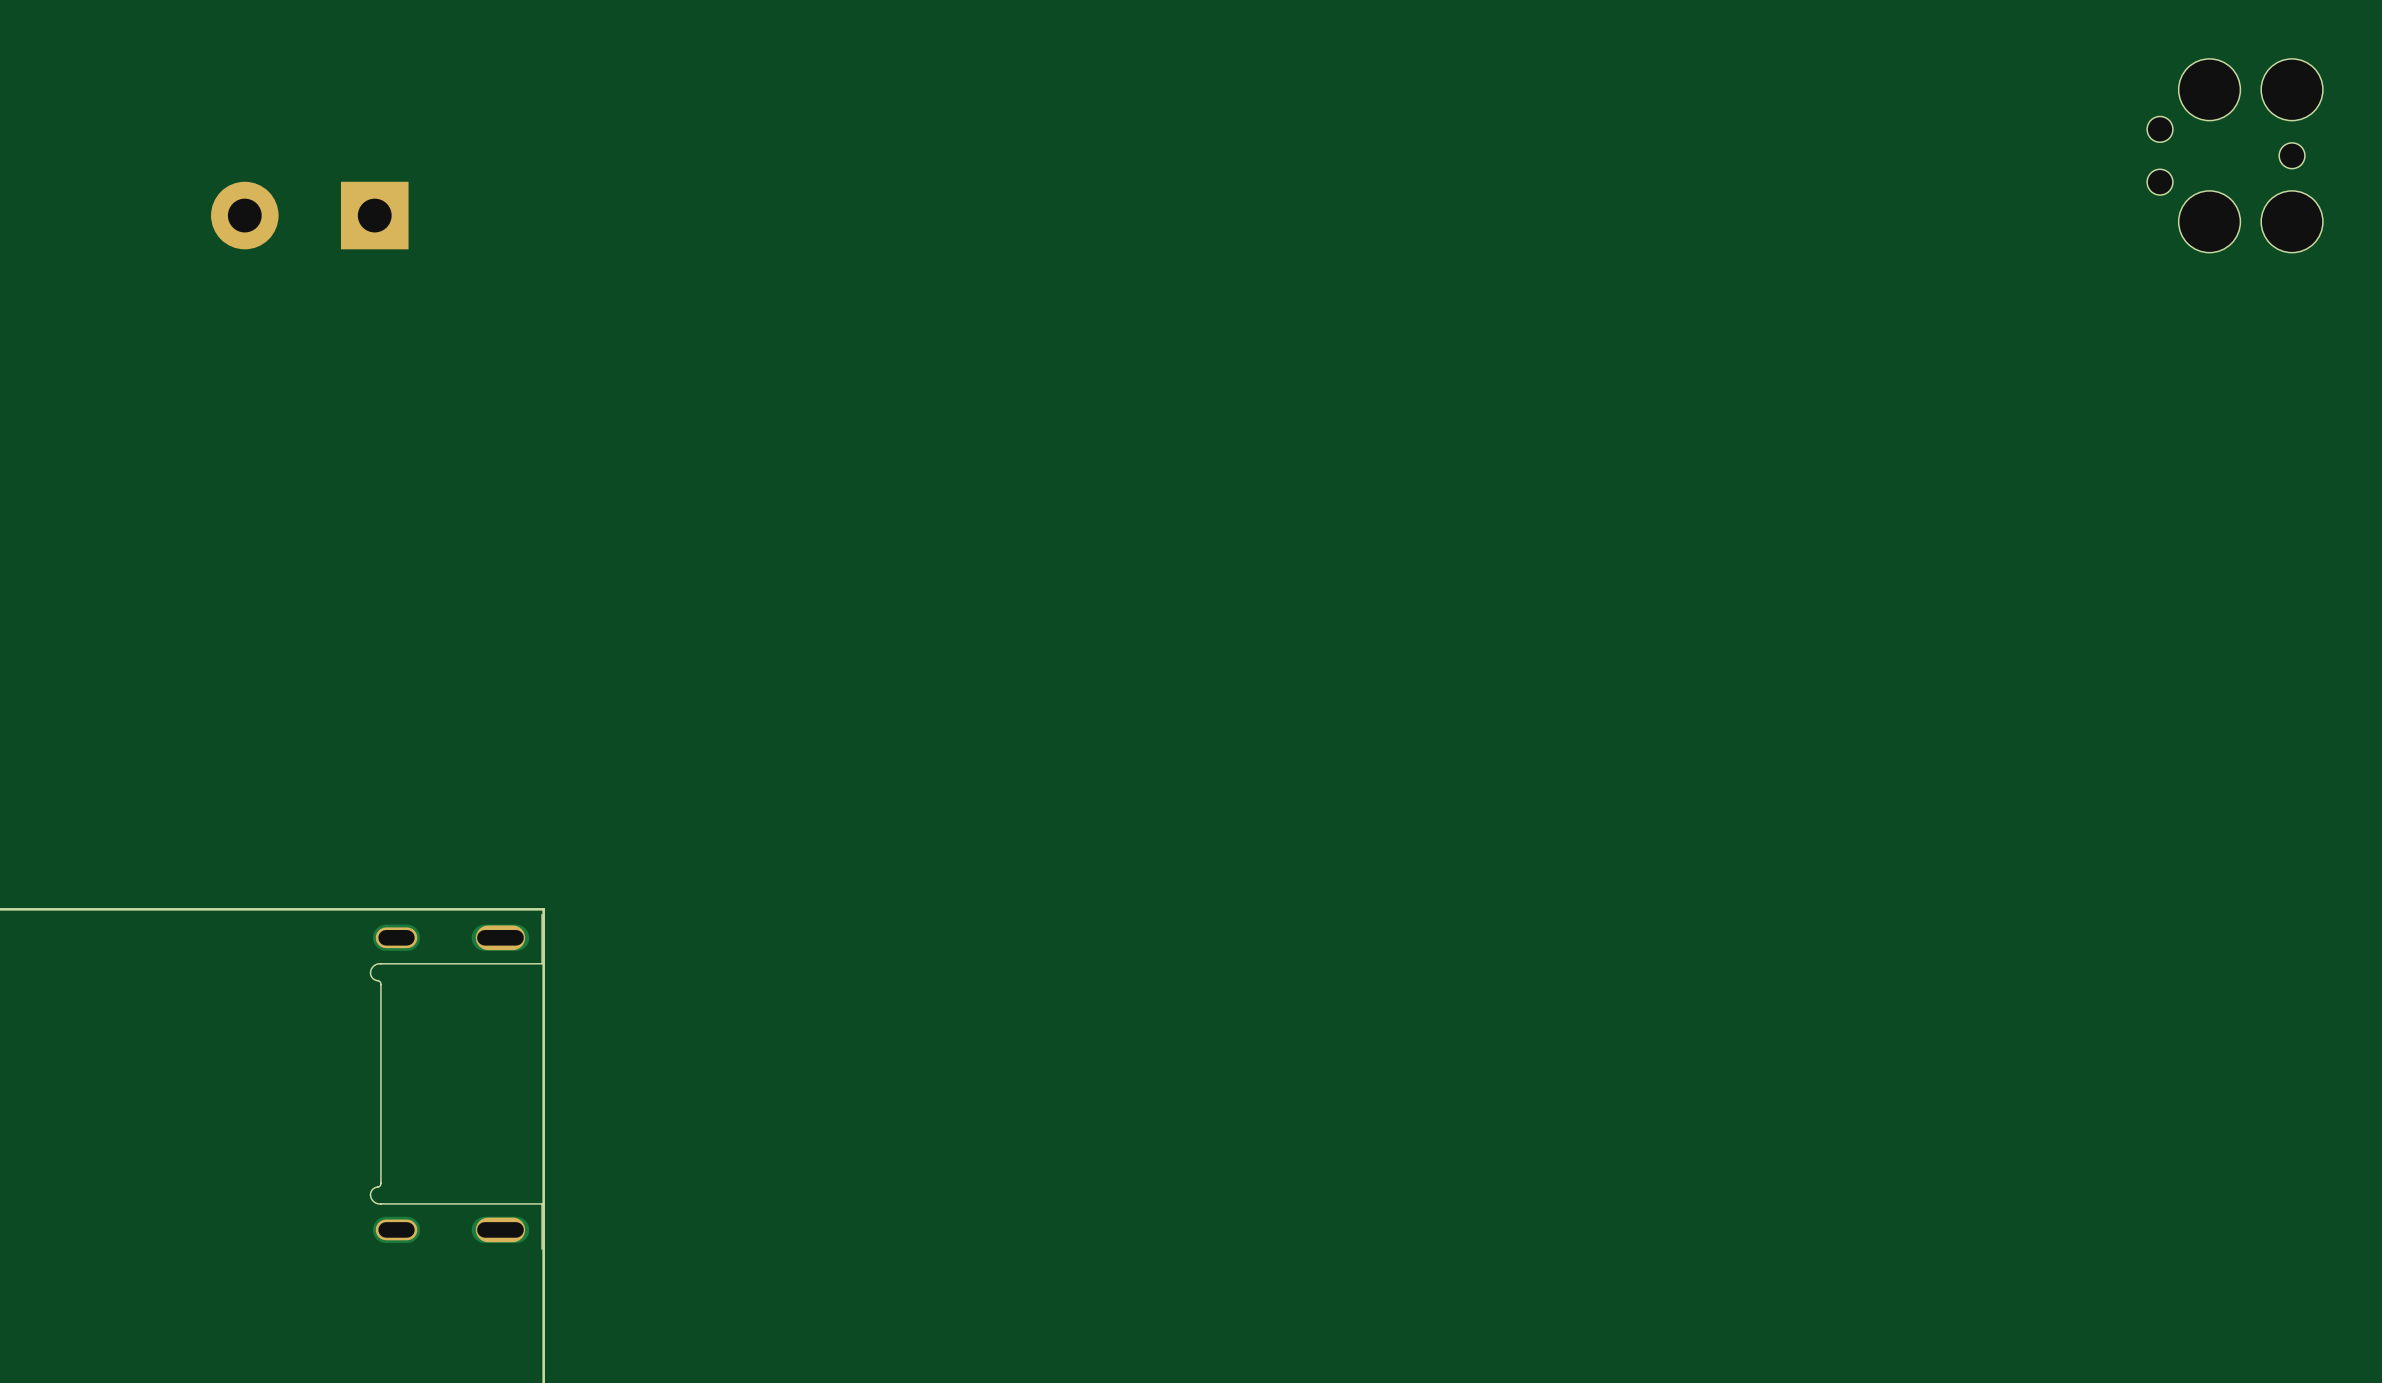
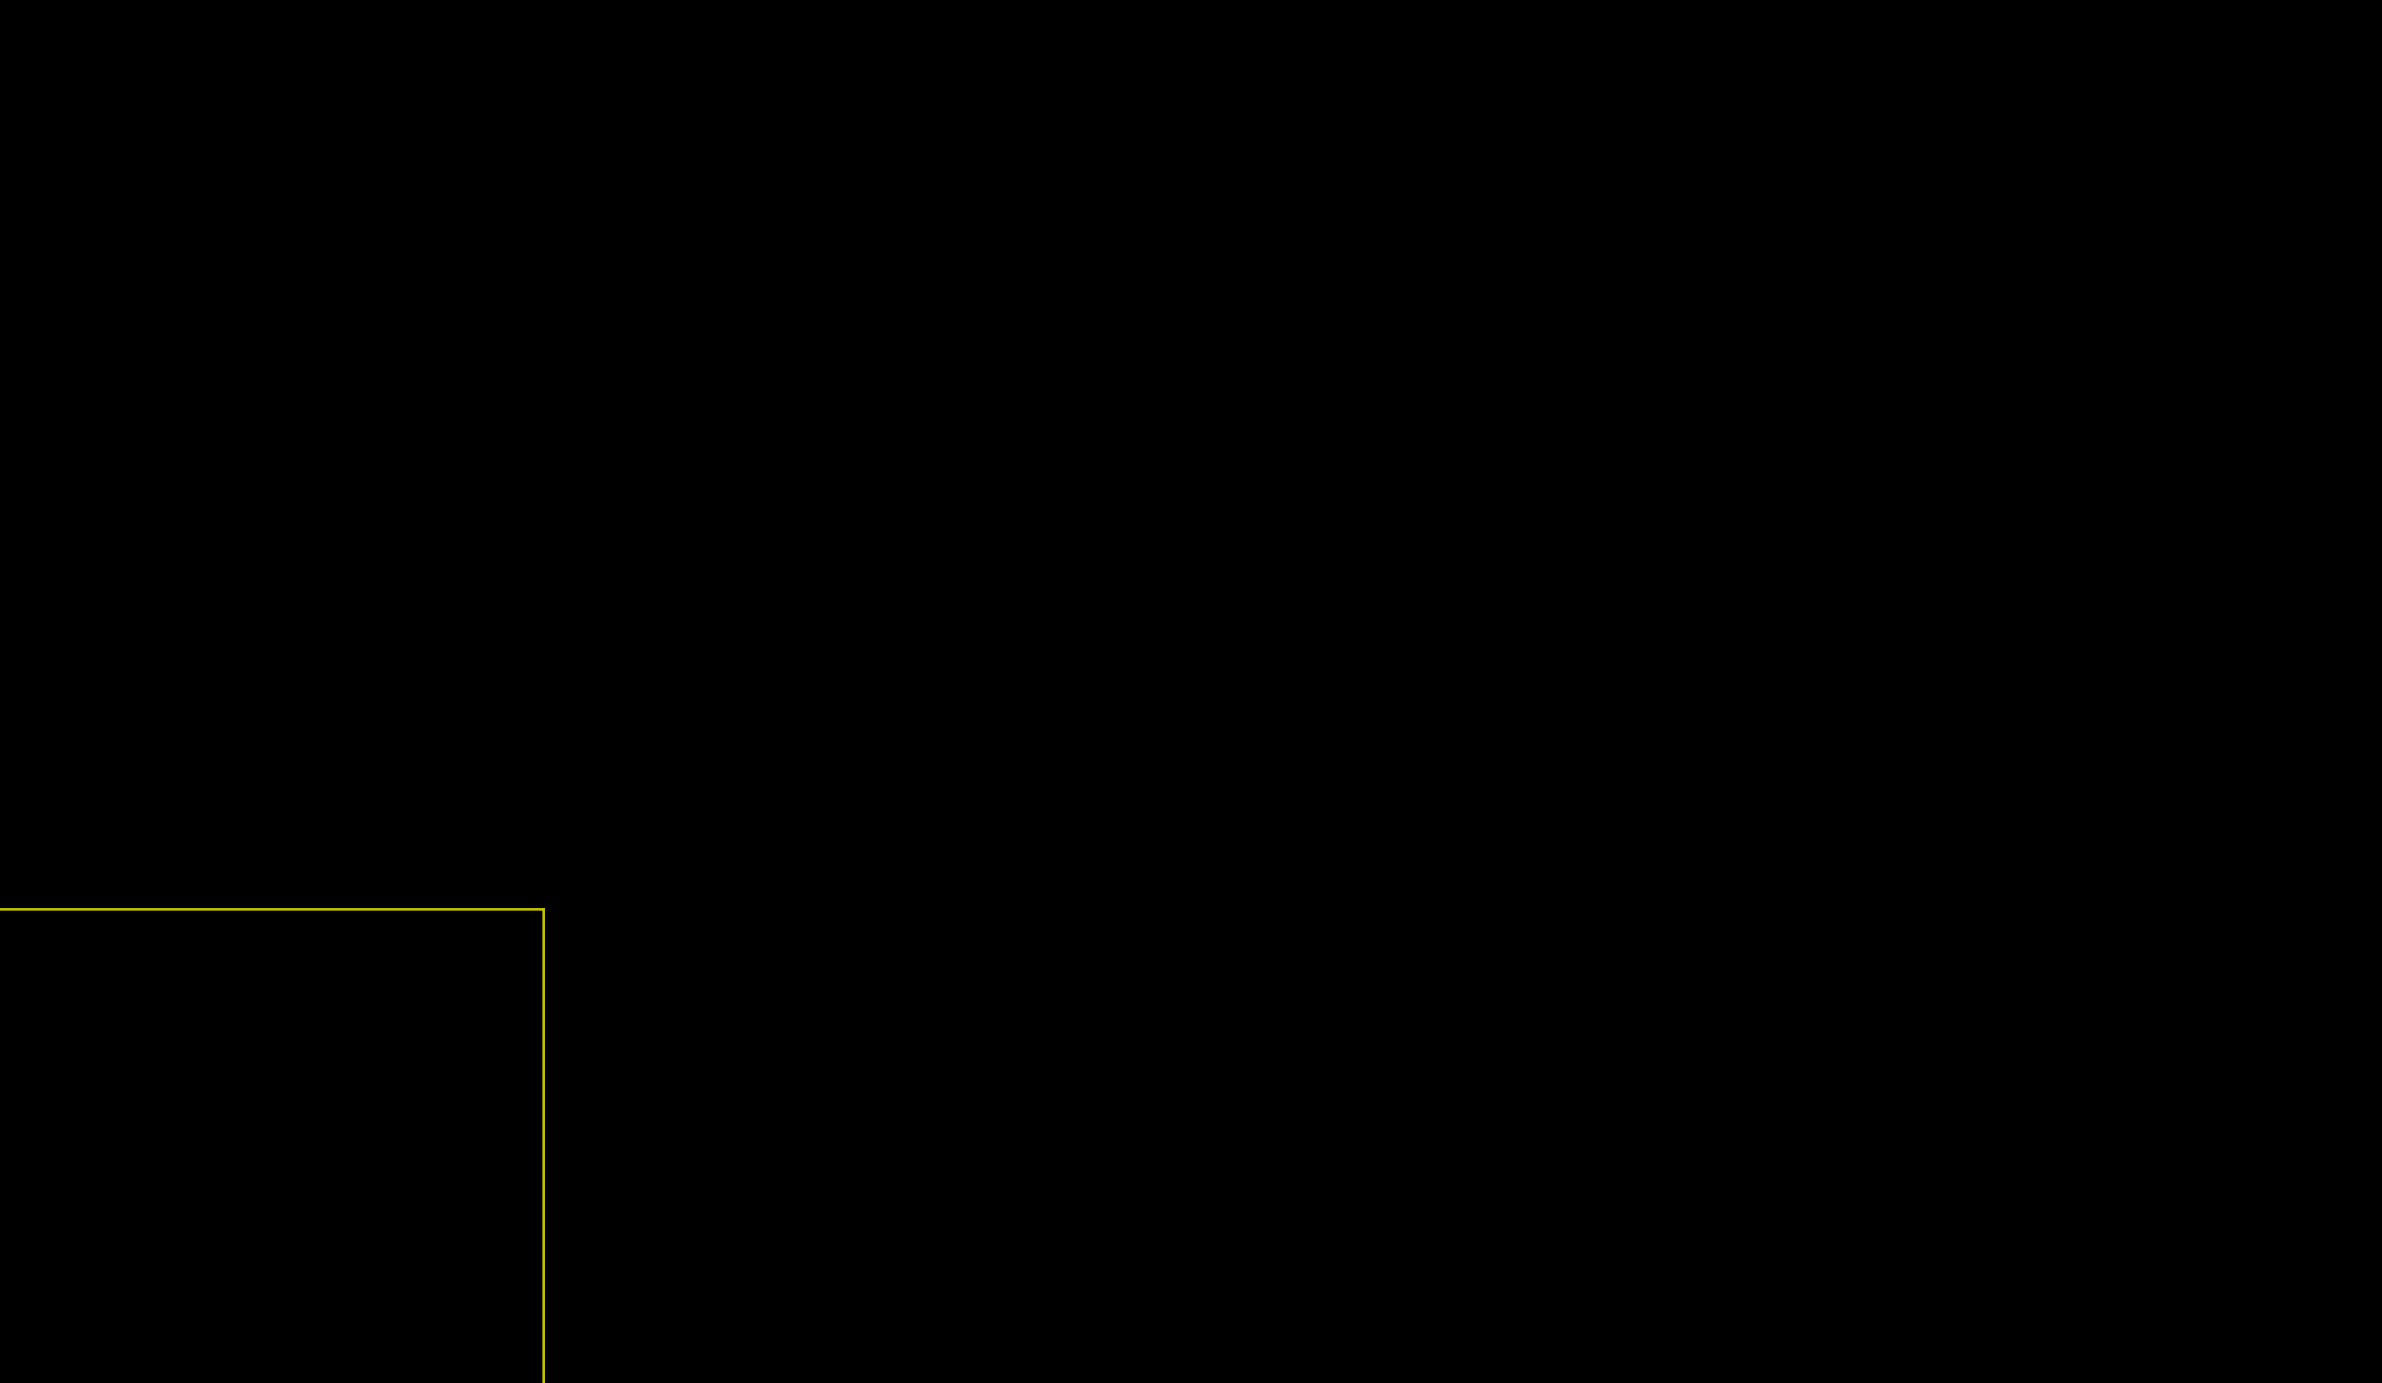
part: (2235, 155) -> none
part: (309, 215) -> none
part: (456, 1081) -> none

